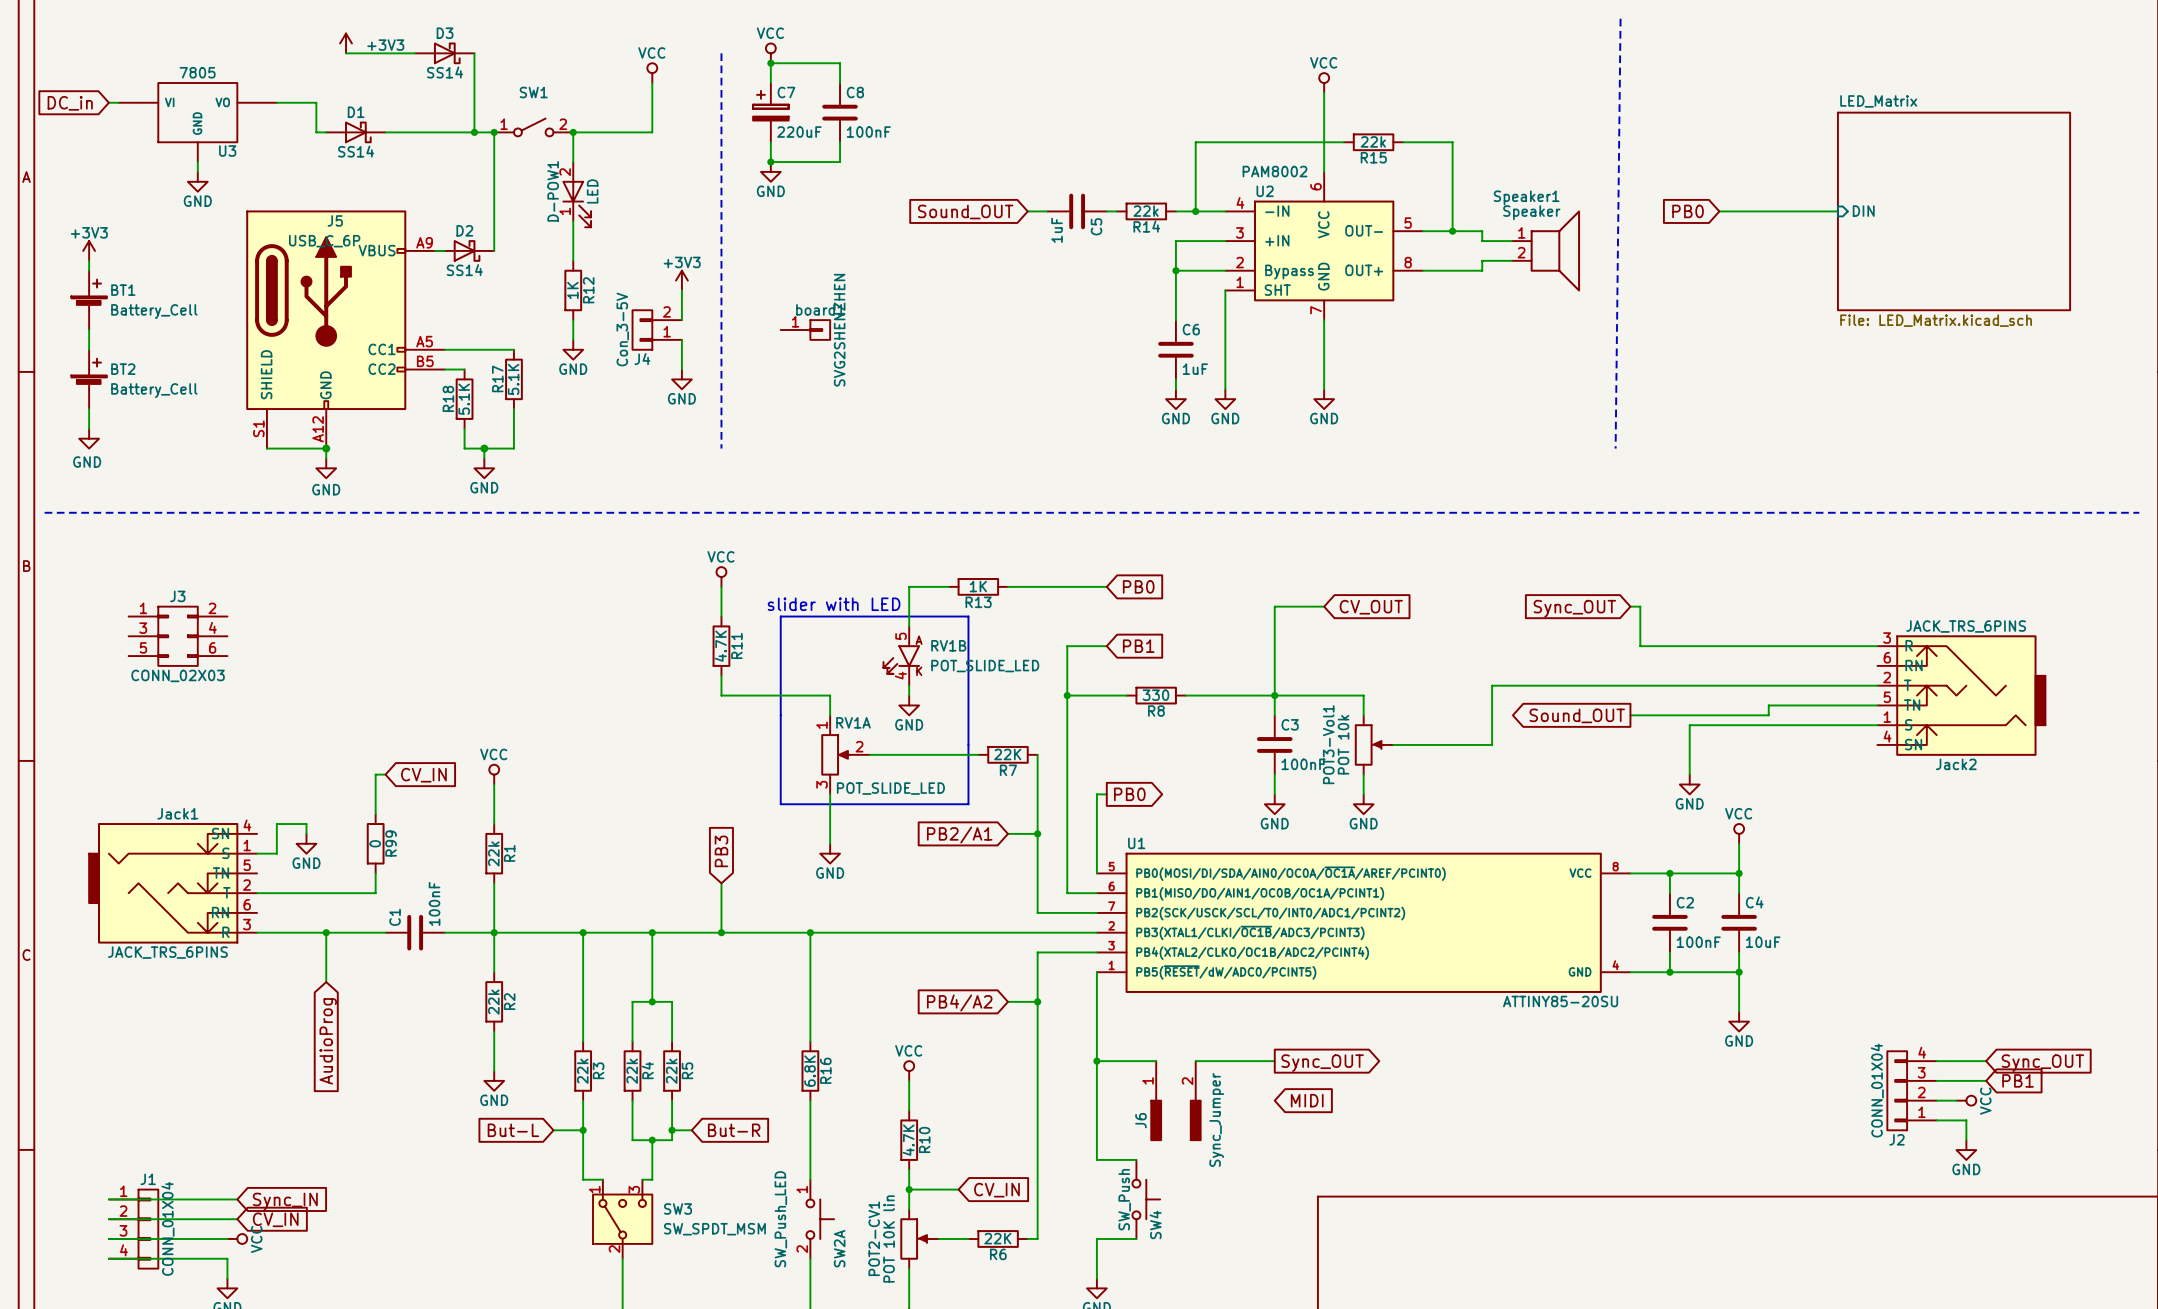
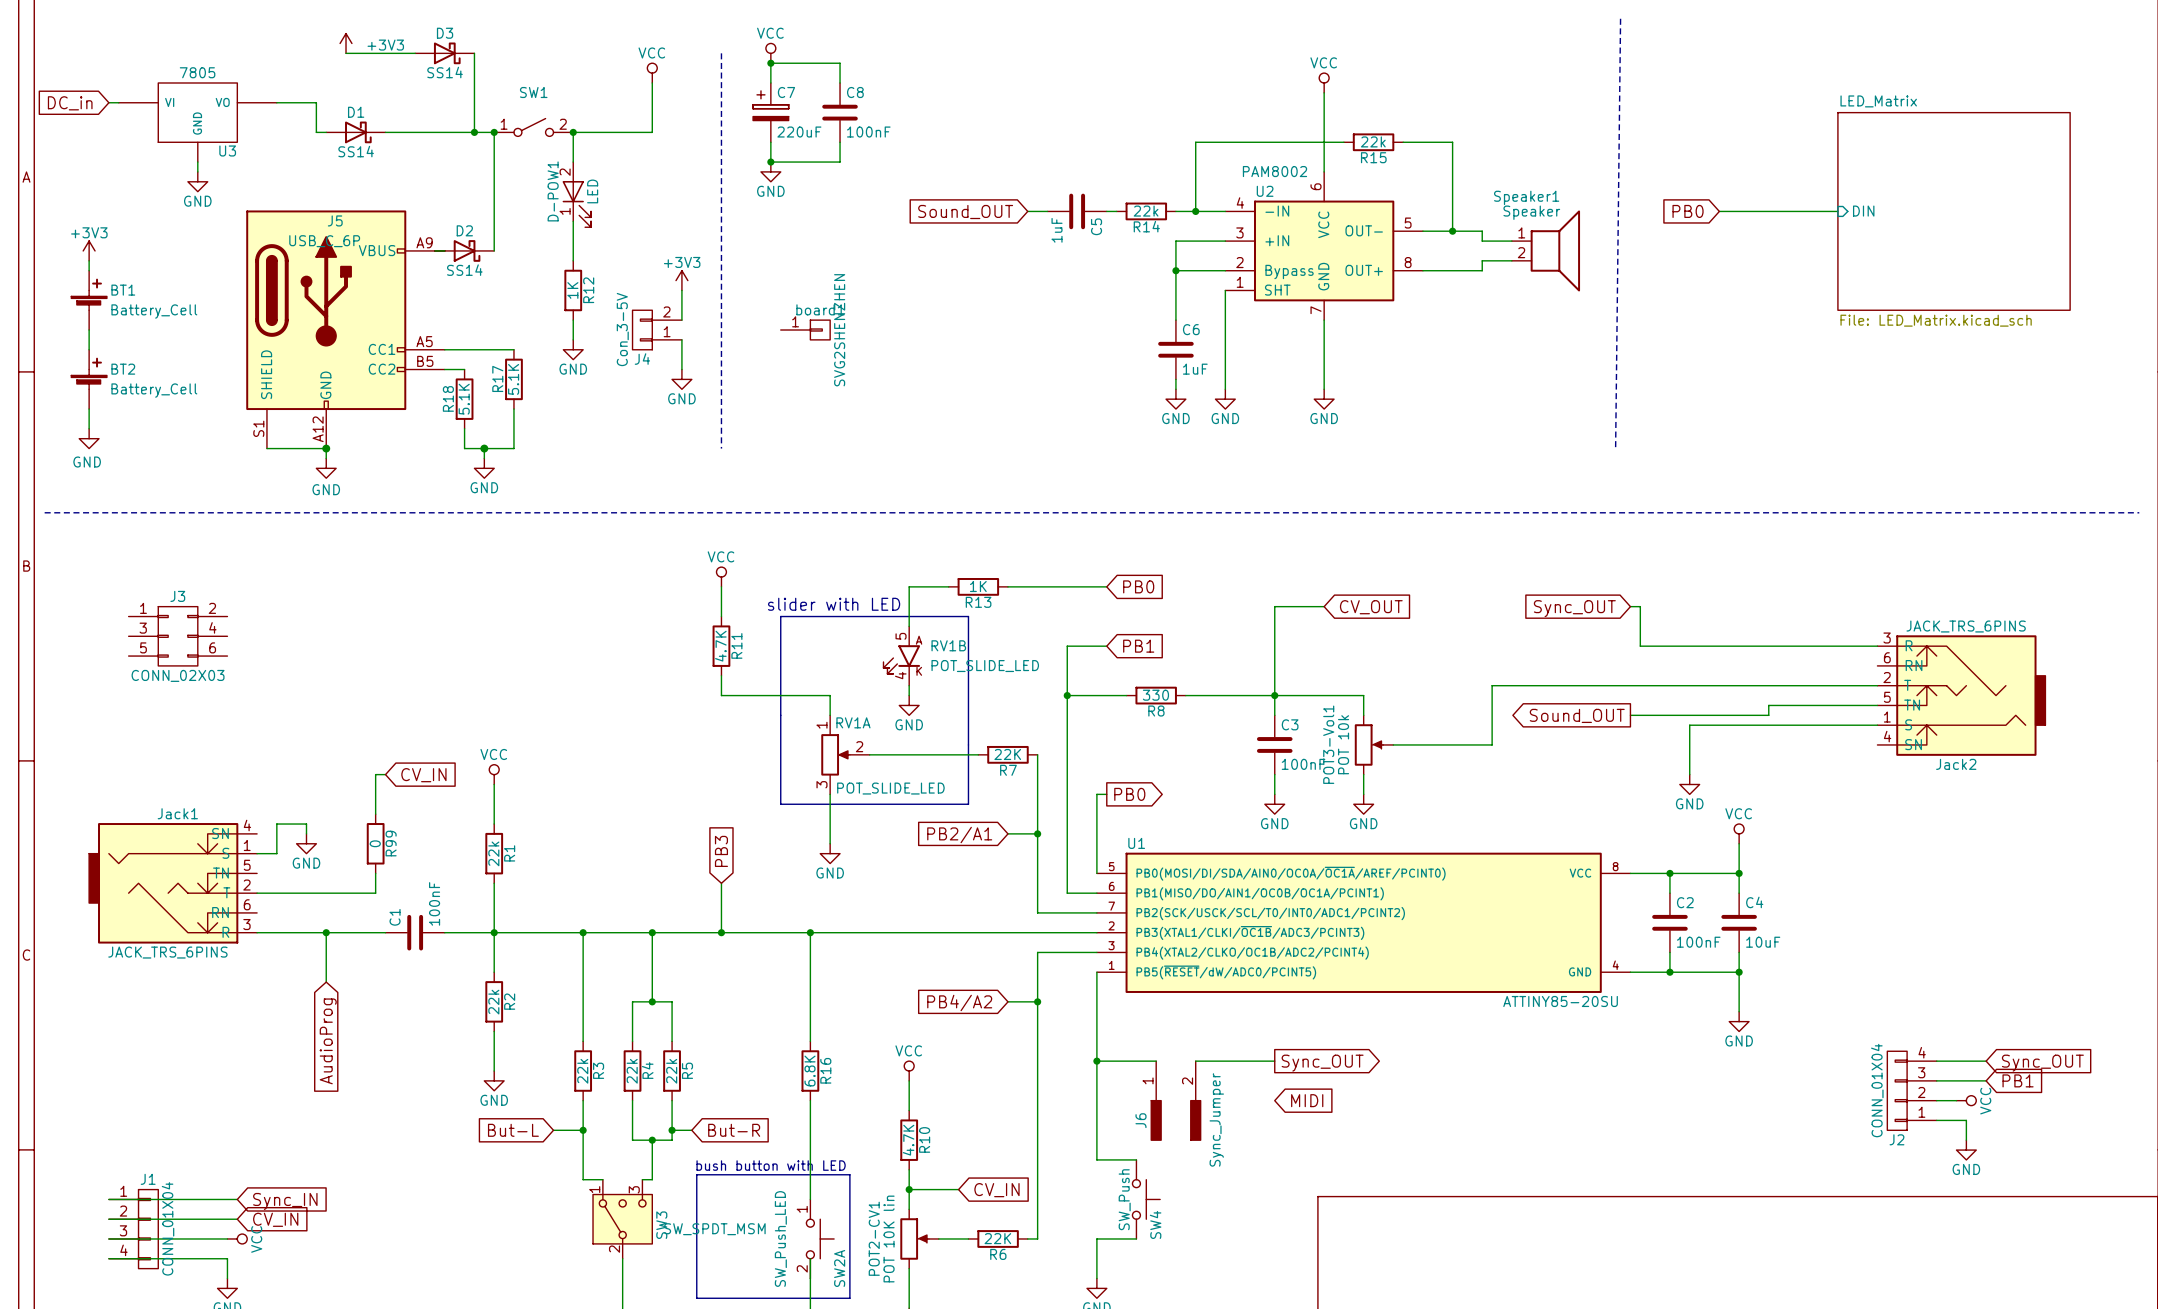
text: none -> bush button with LED (771, 1165)
line: none -> (696, 1174) (849, 1174) (849, 1298) (696, 1298) (696, 1174)
SW3 name rotation: 0° (678, 1208) -> 90° counterclockwise (661, 1225)
SW2A position: (820, 1219) -> (820, 1238)

